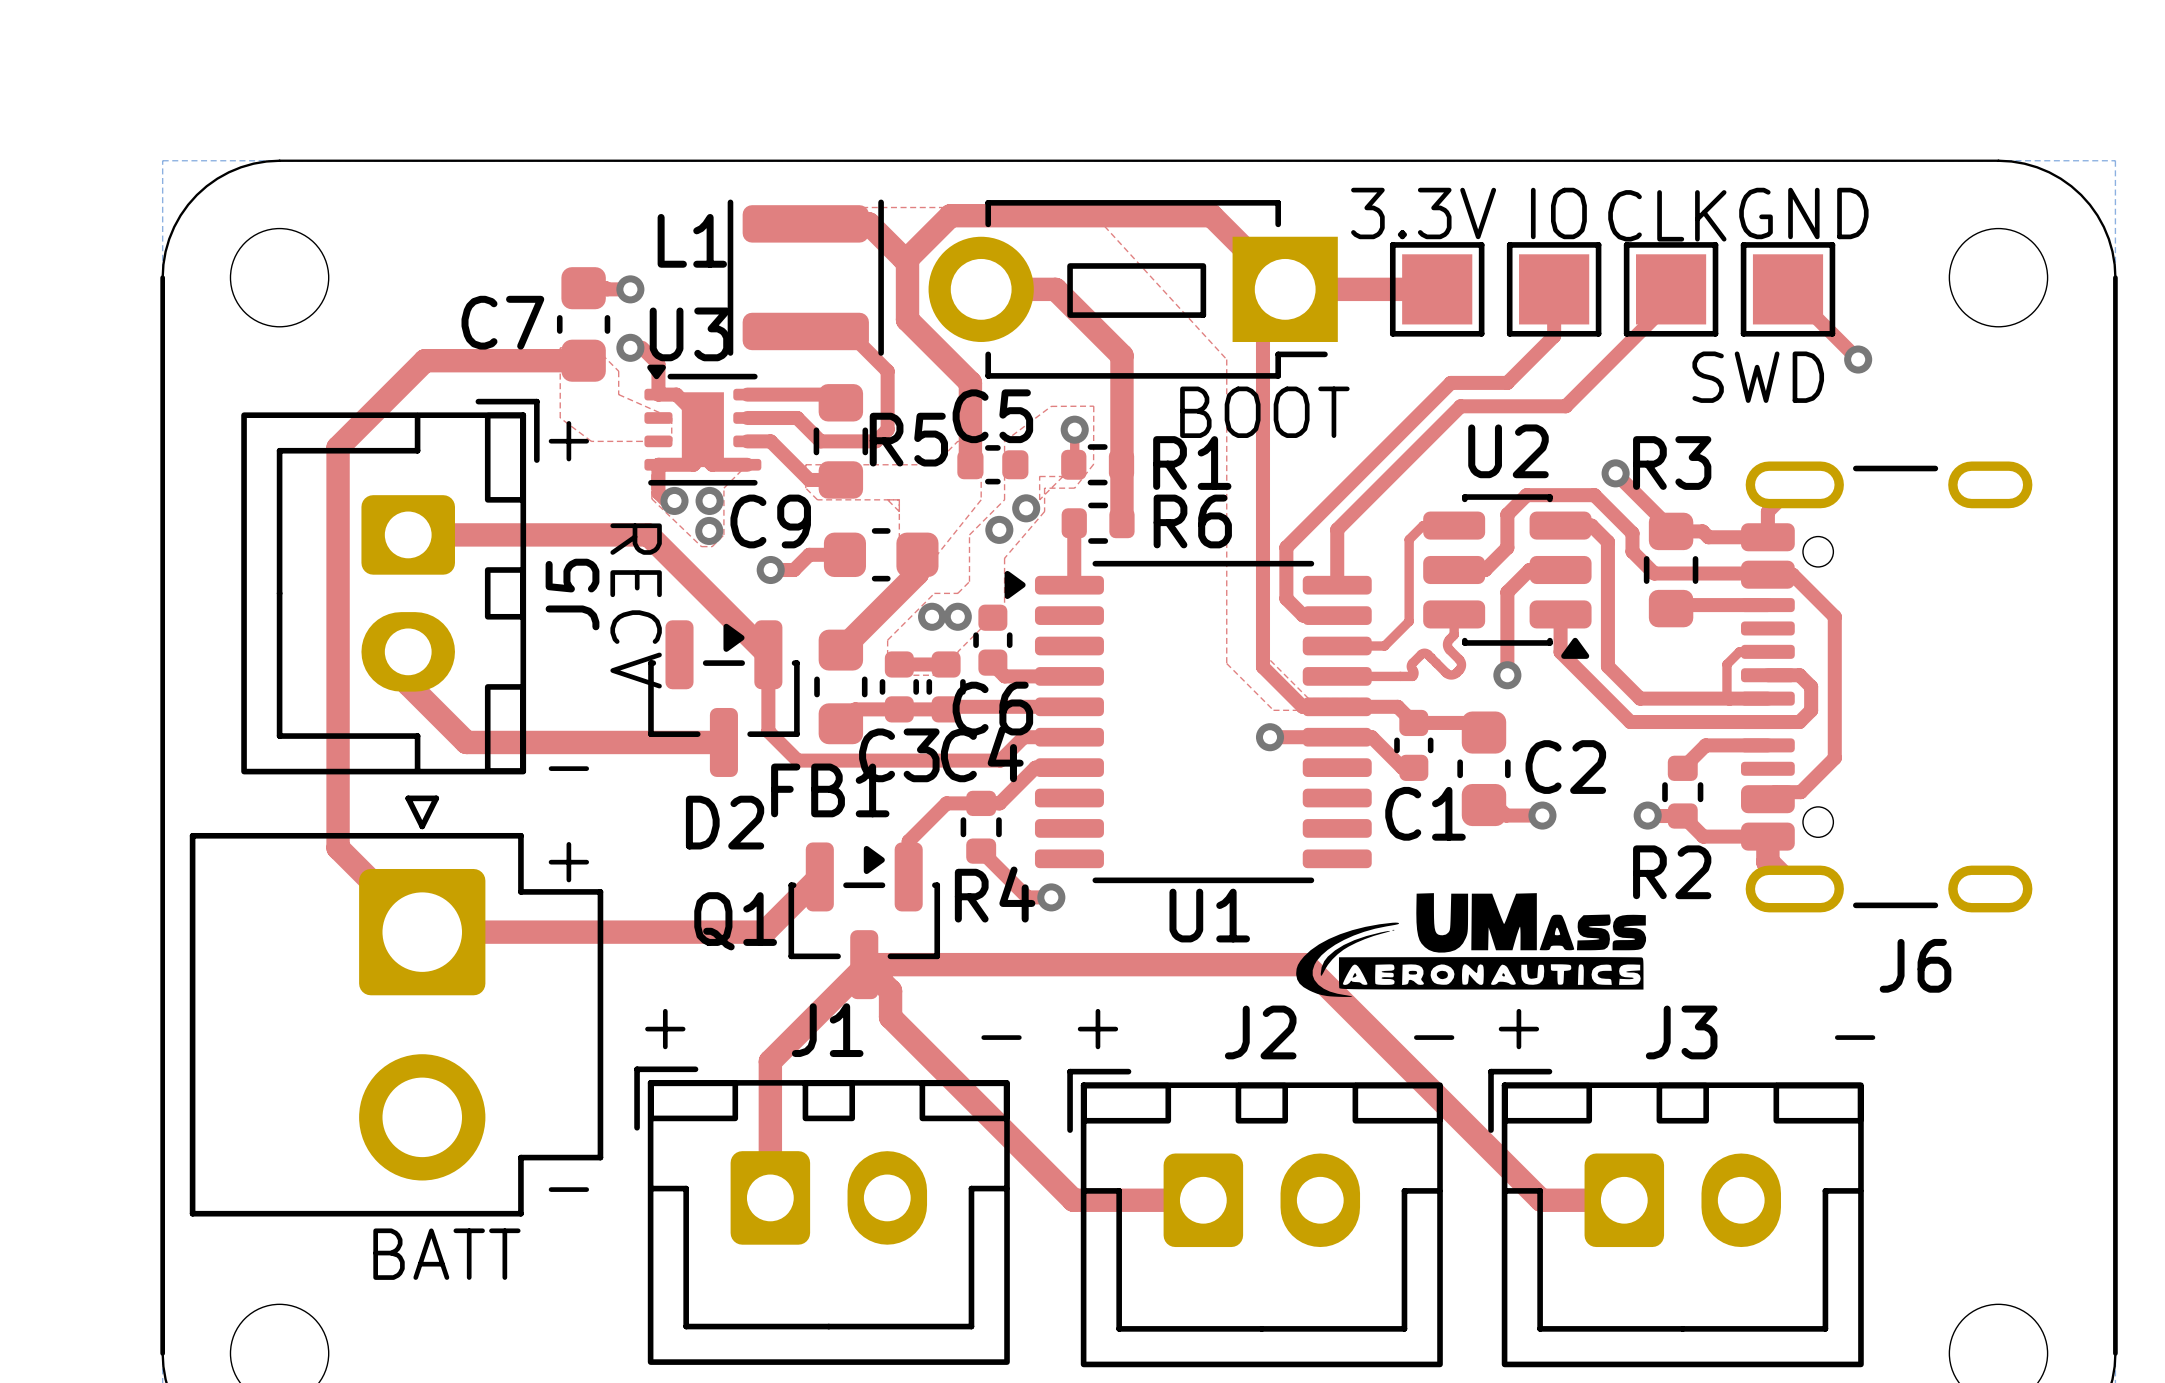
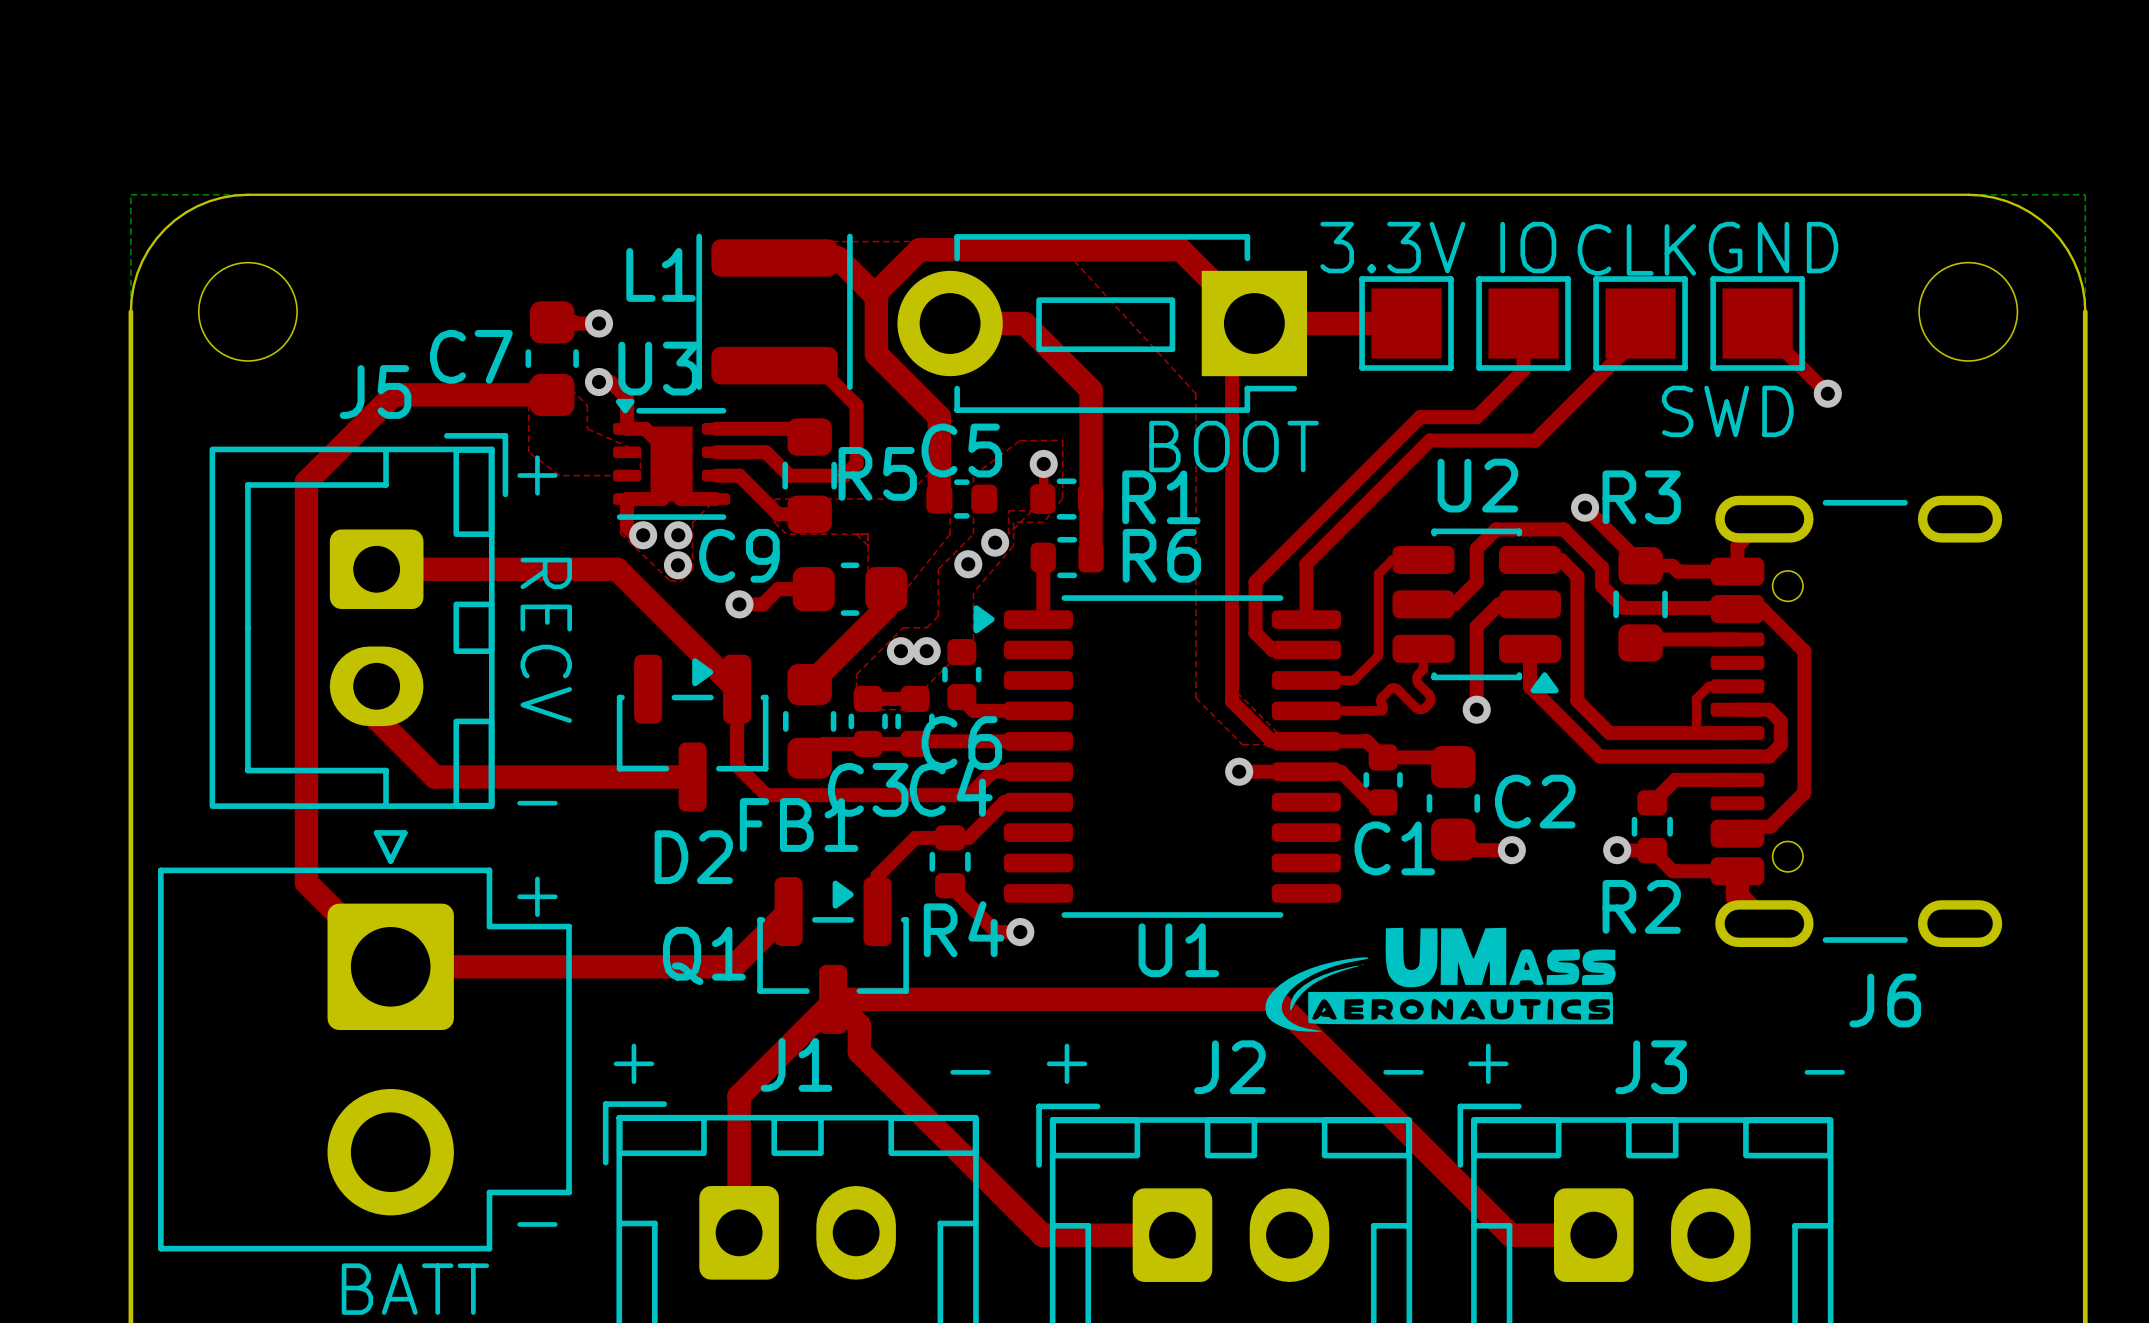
J5 name rotation: 0° (572, 594) -> 90° clockwise (375, 391)
J5 name position: J5 (572, 594) -> J5 (375, 391)
text position: RECV (636, 605) -> RECV (546, 640)

